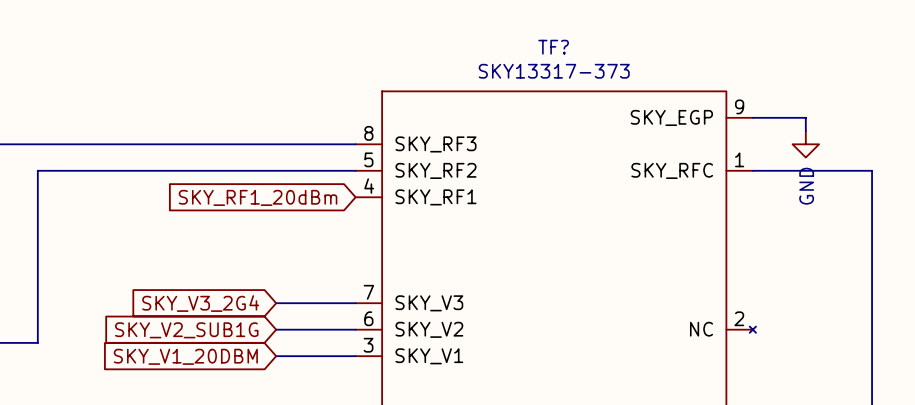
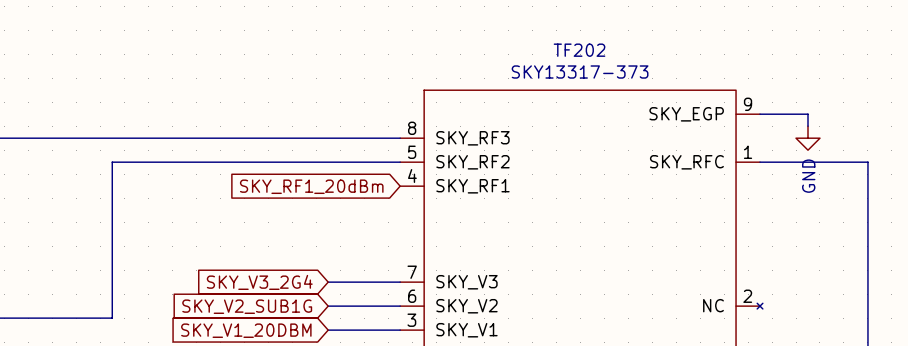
TF? name: TF? (553, 47) -> TF202 (579, 50)

